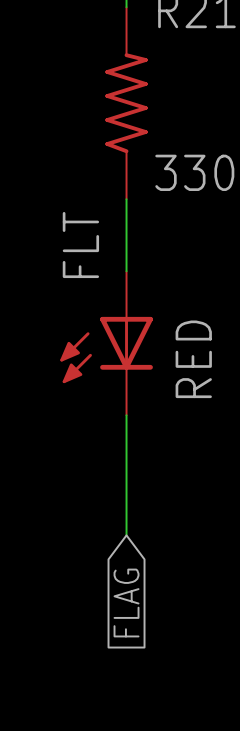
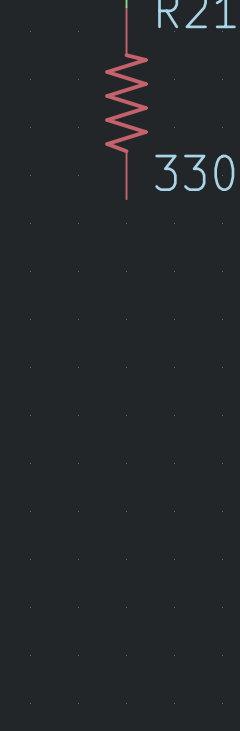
wire: (126, 199) (126, 271) -> none
FLT: RED (106, 343) -> none
wire: (126, 415) (126, 535) -> none
global label: FLAG (126, 603) -> none

